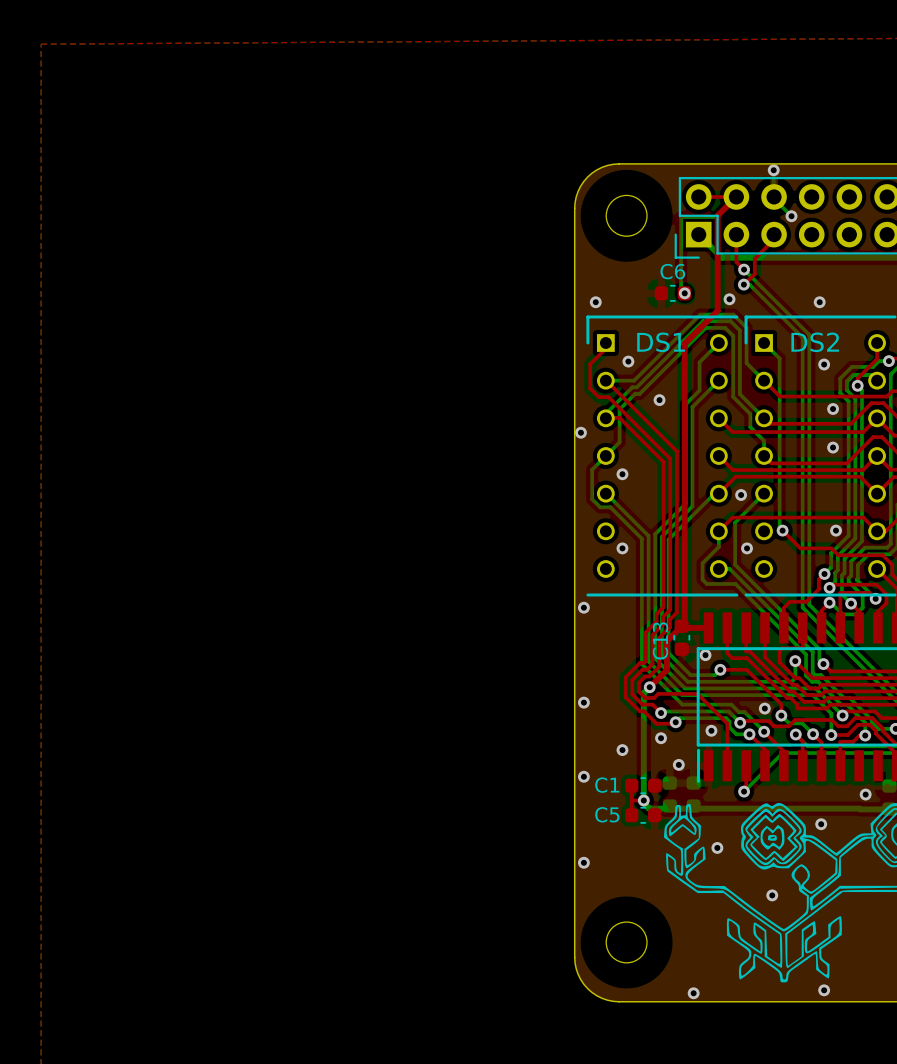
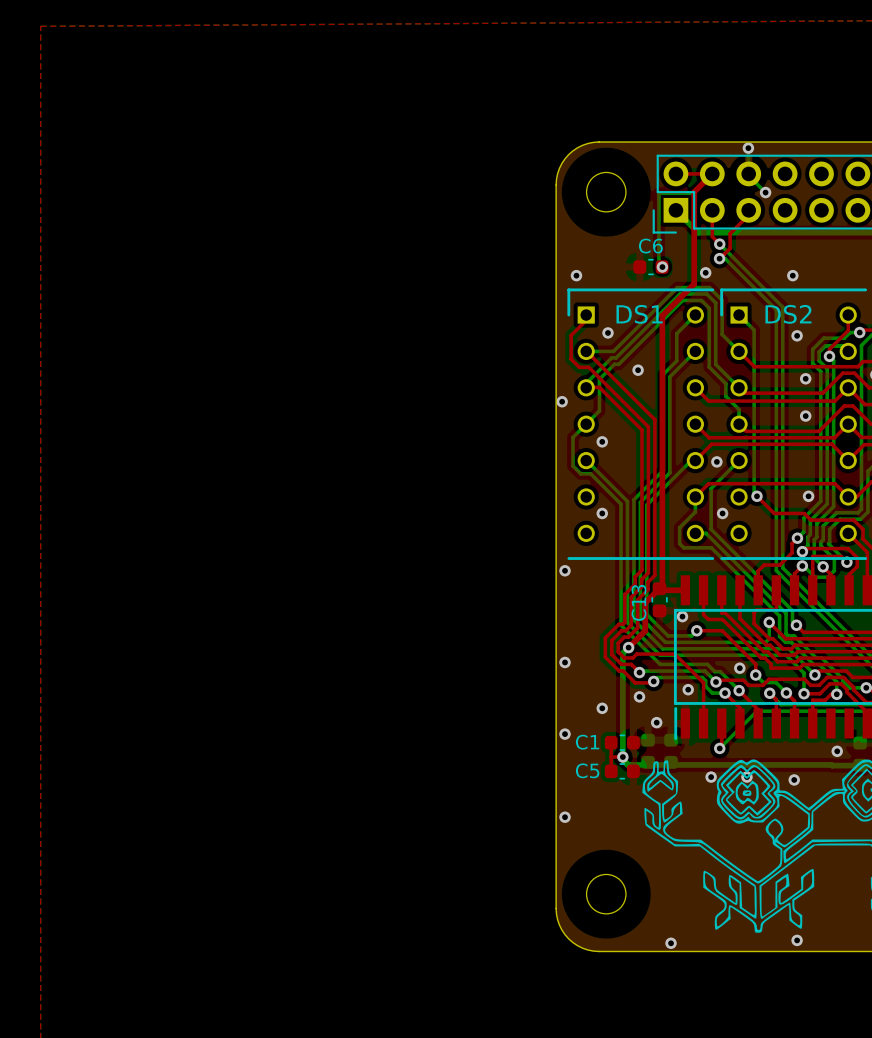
via: none -> (711, 777)
via: none -> (746, 777)
via: (717, 847) -> none
via: (772, 895) -> none

